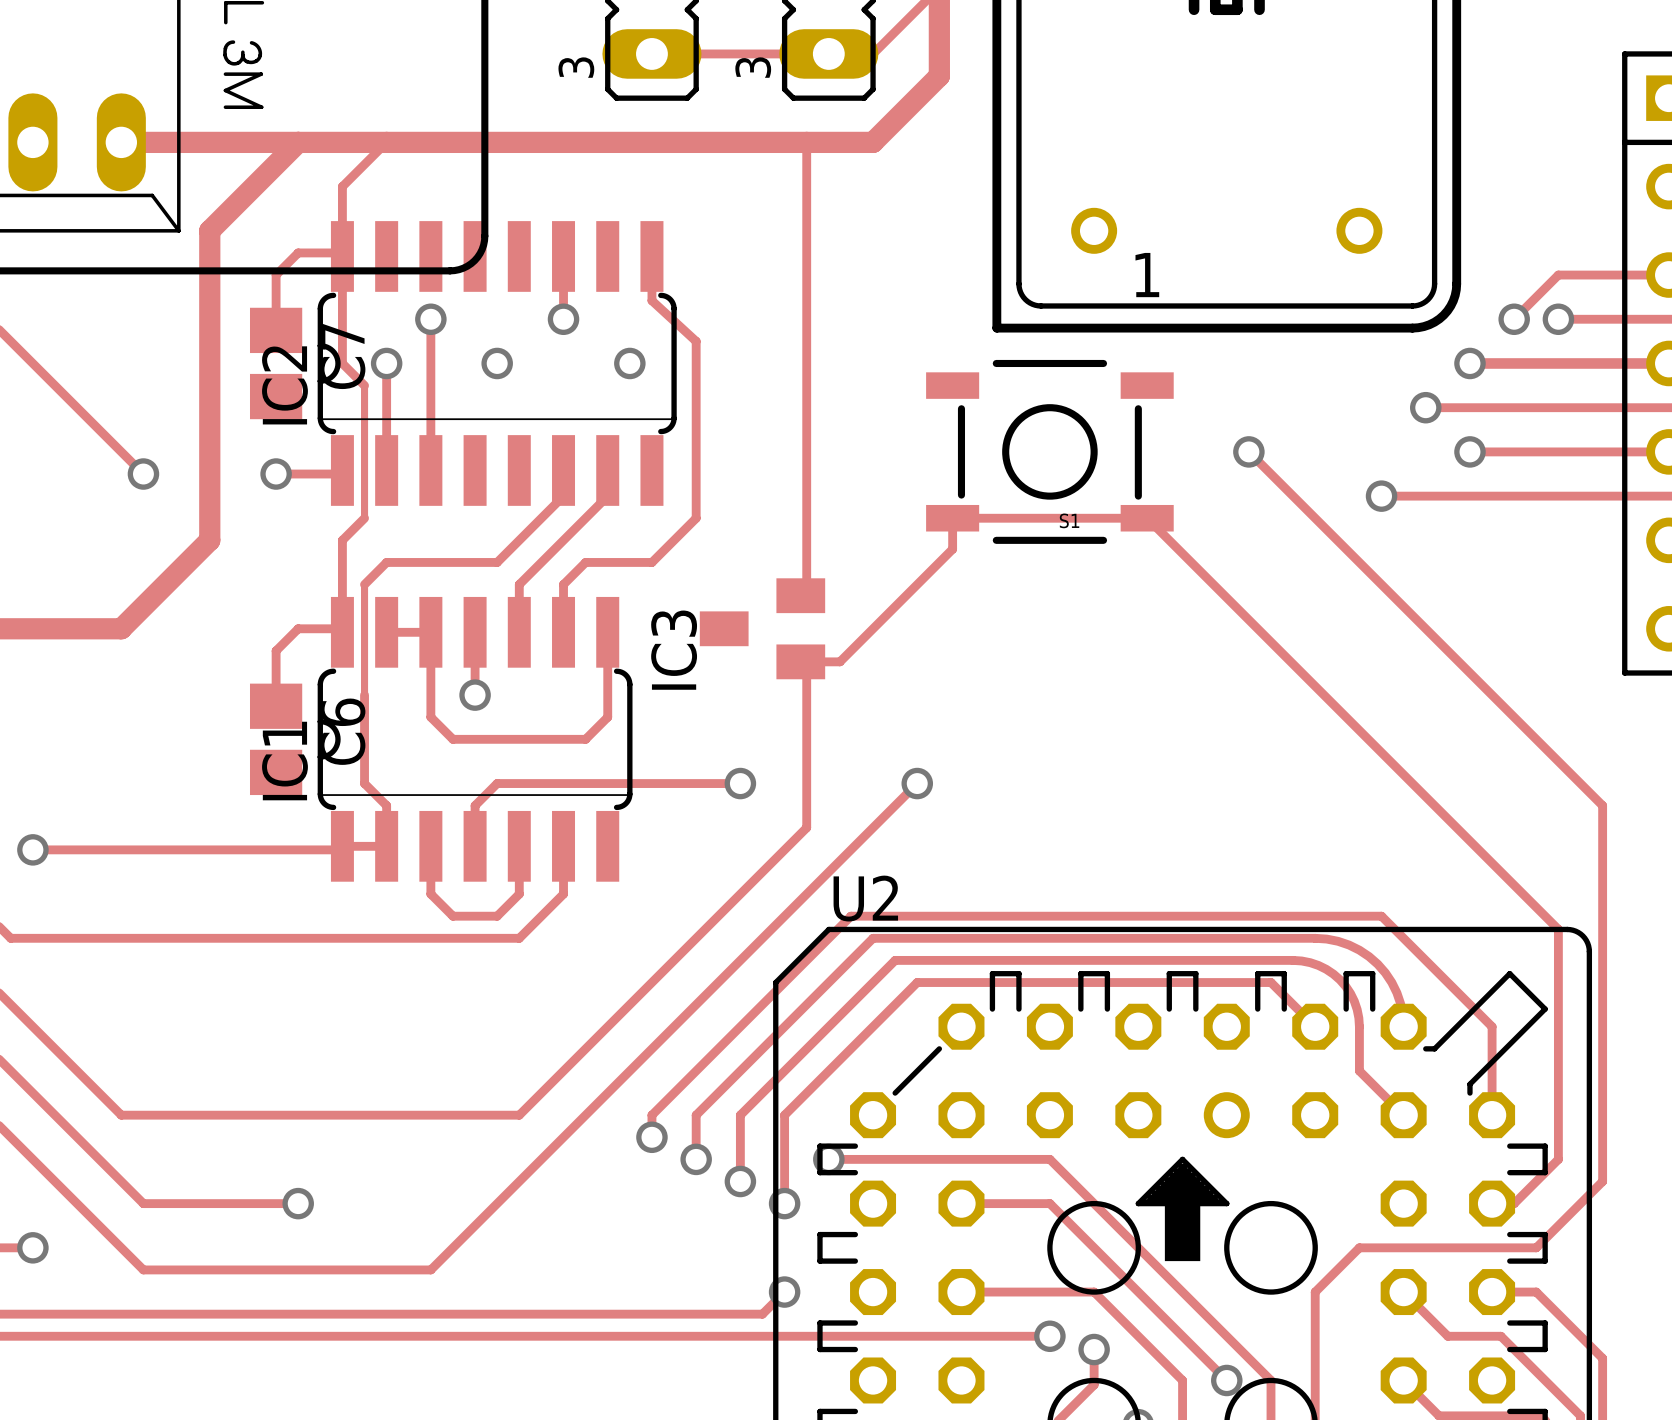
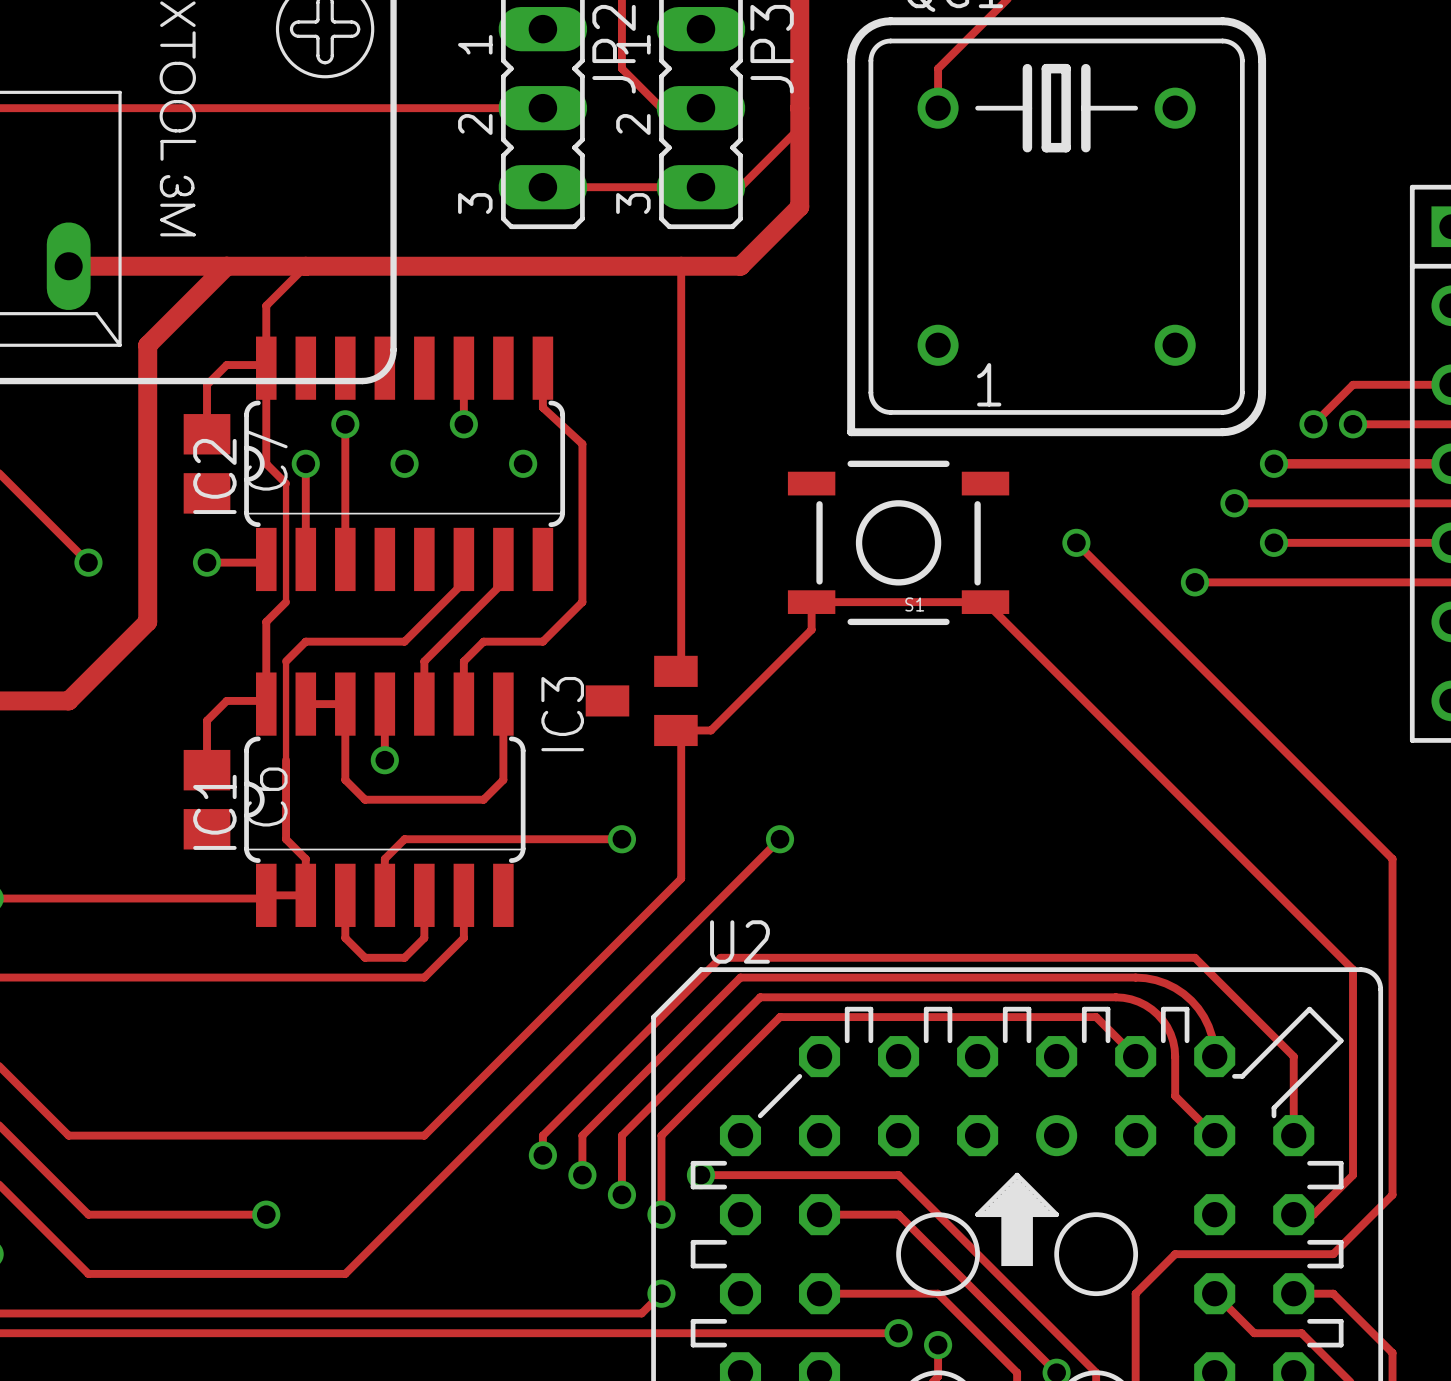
track: none -> (226, 1214) (266, 1214)
via position: (298, 1203) -> (266, 1214)

